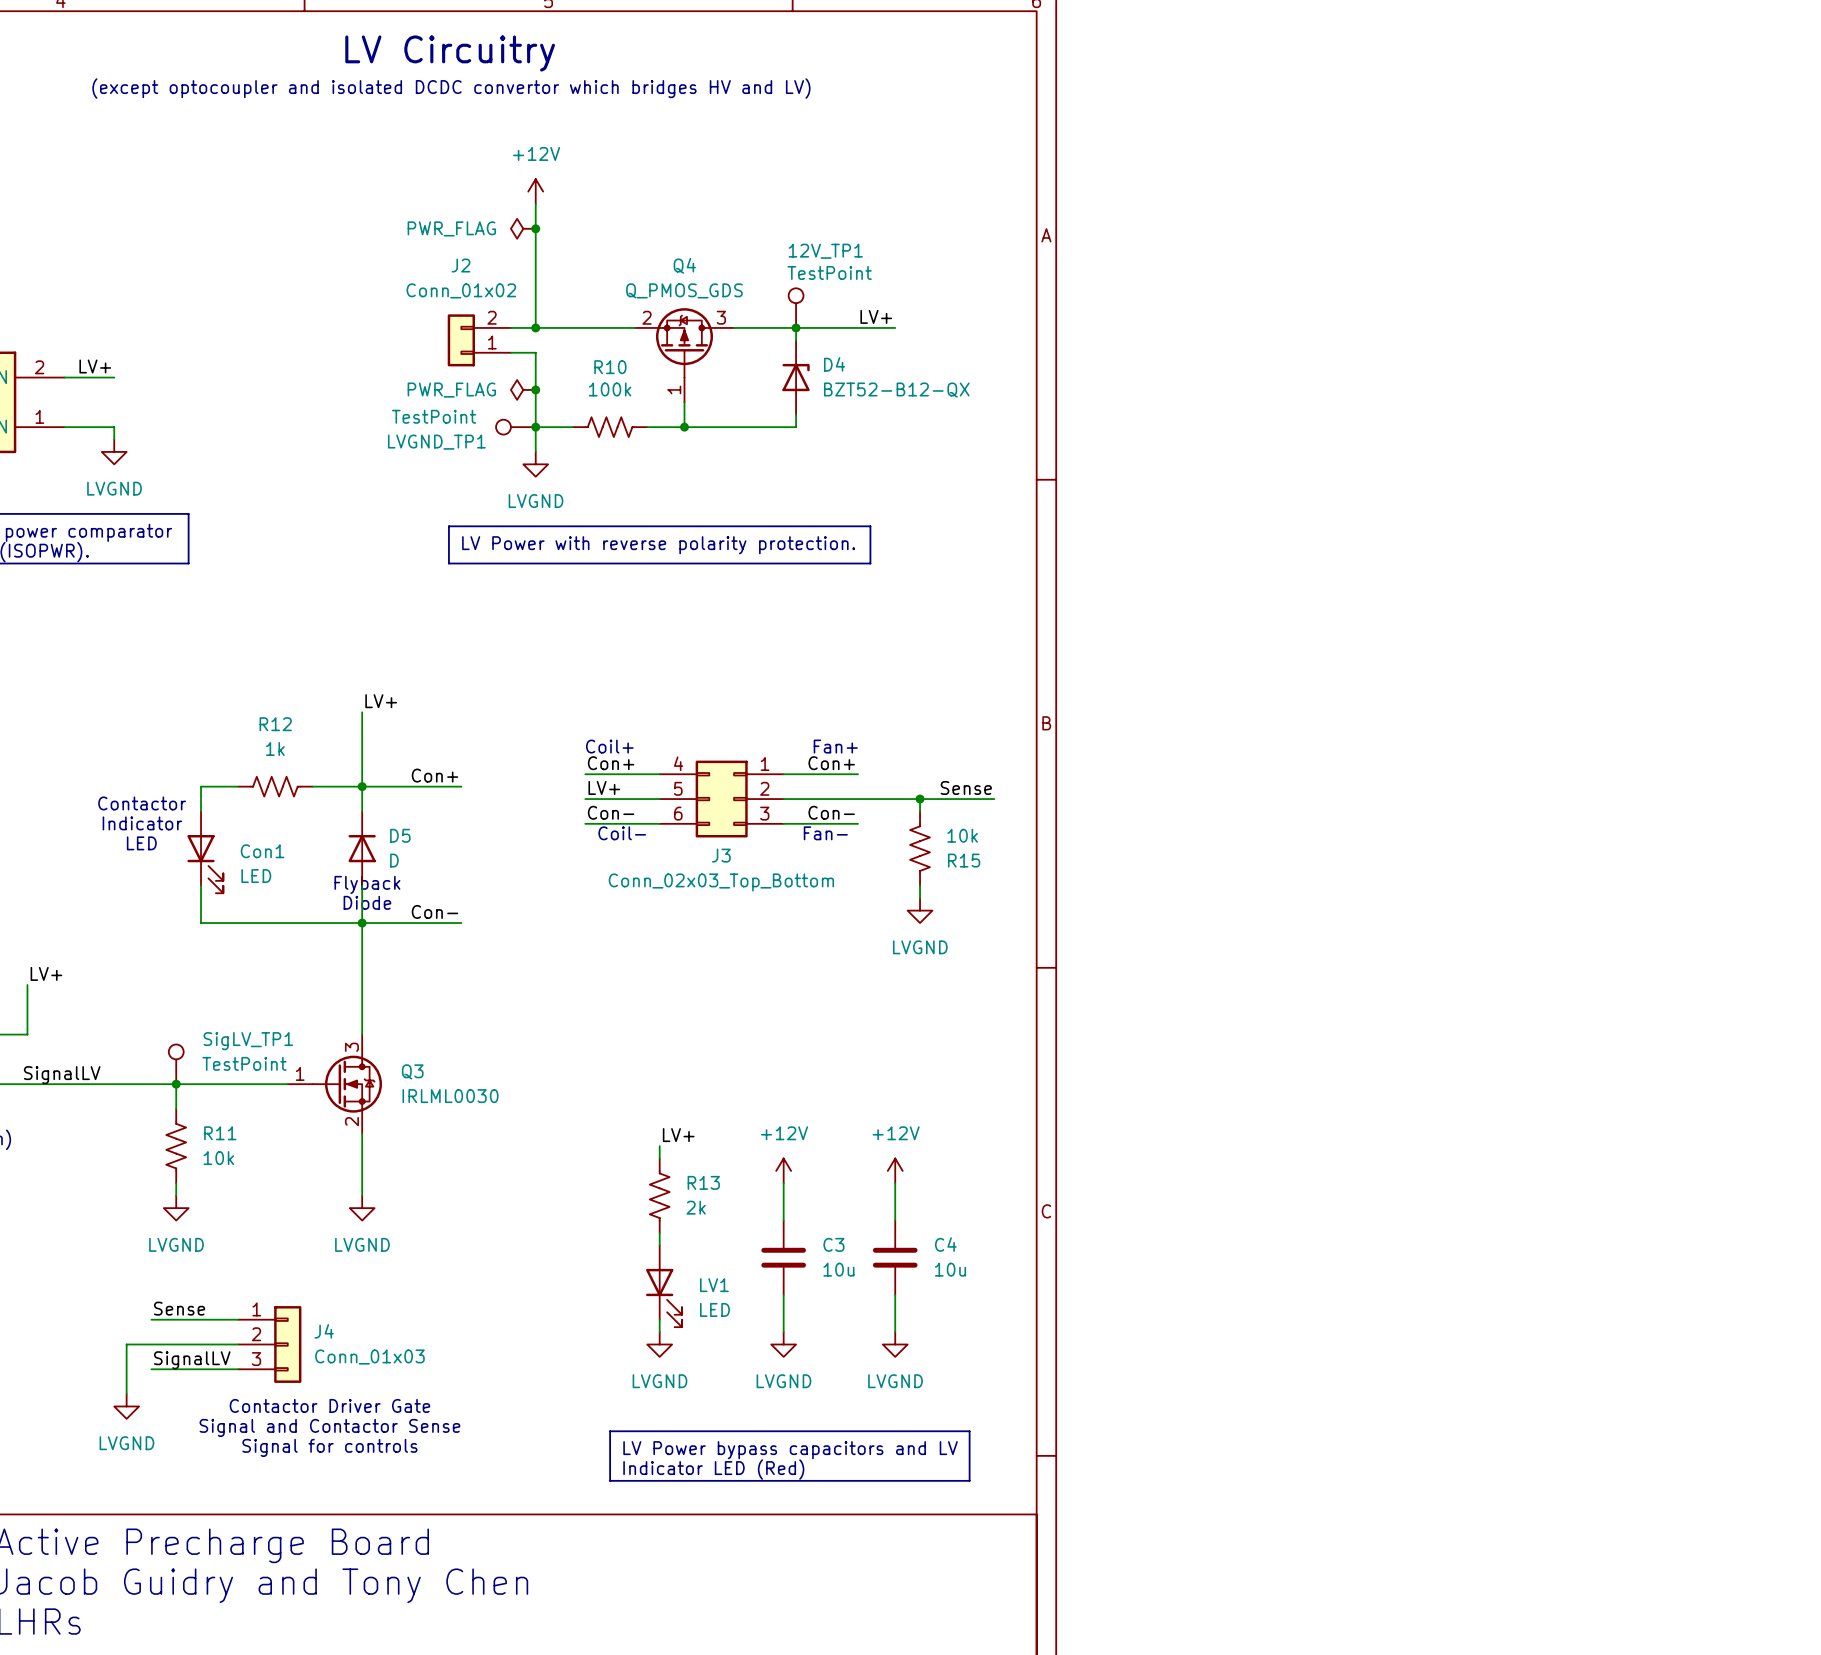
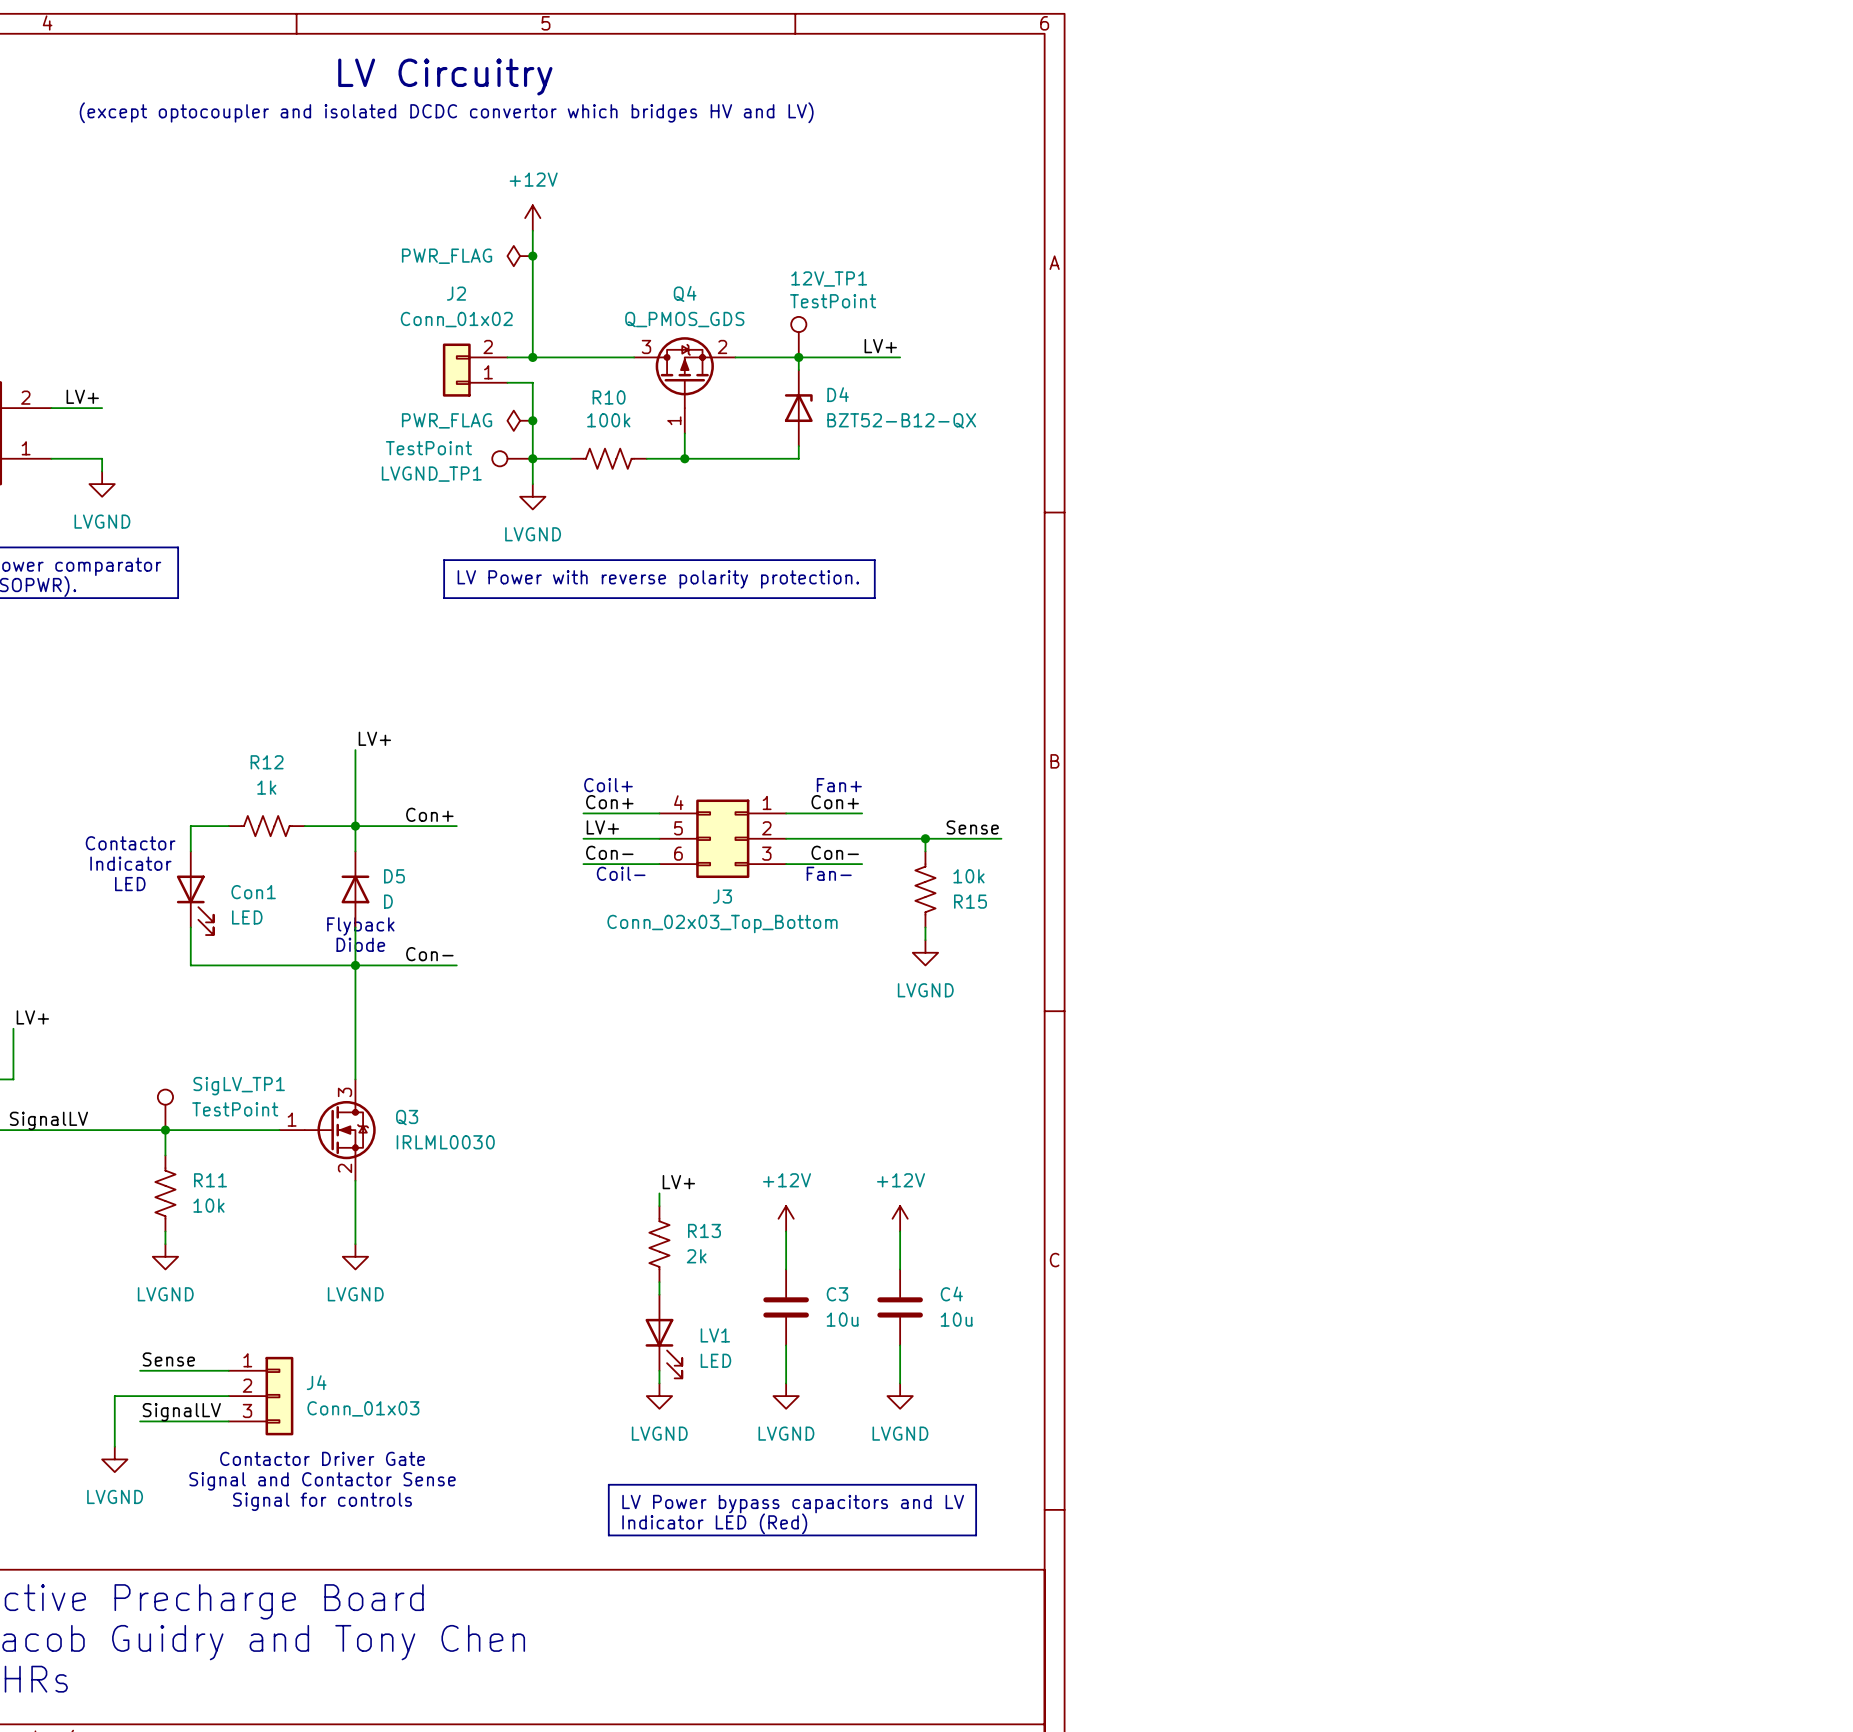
Q4 flip: as is (684, 342) -> left-right (684, 372)

